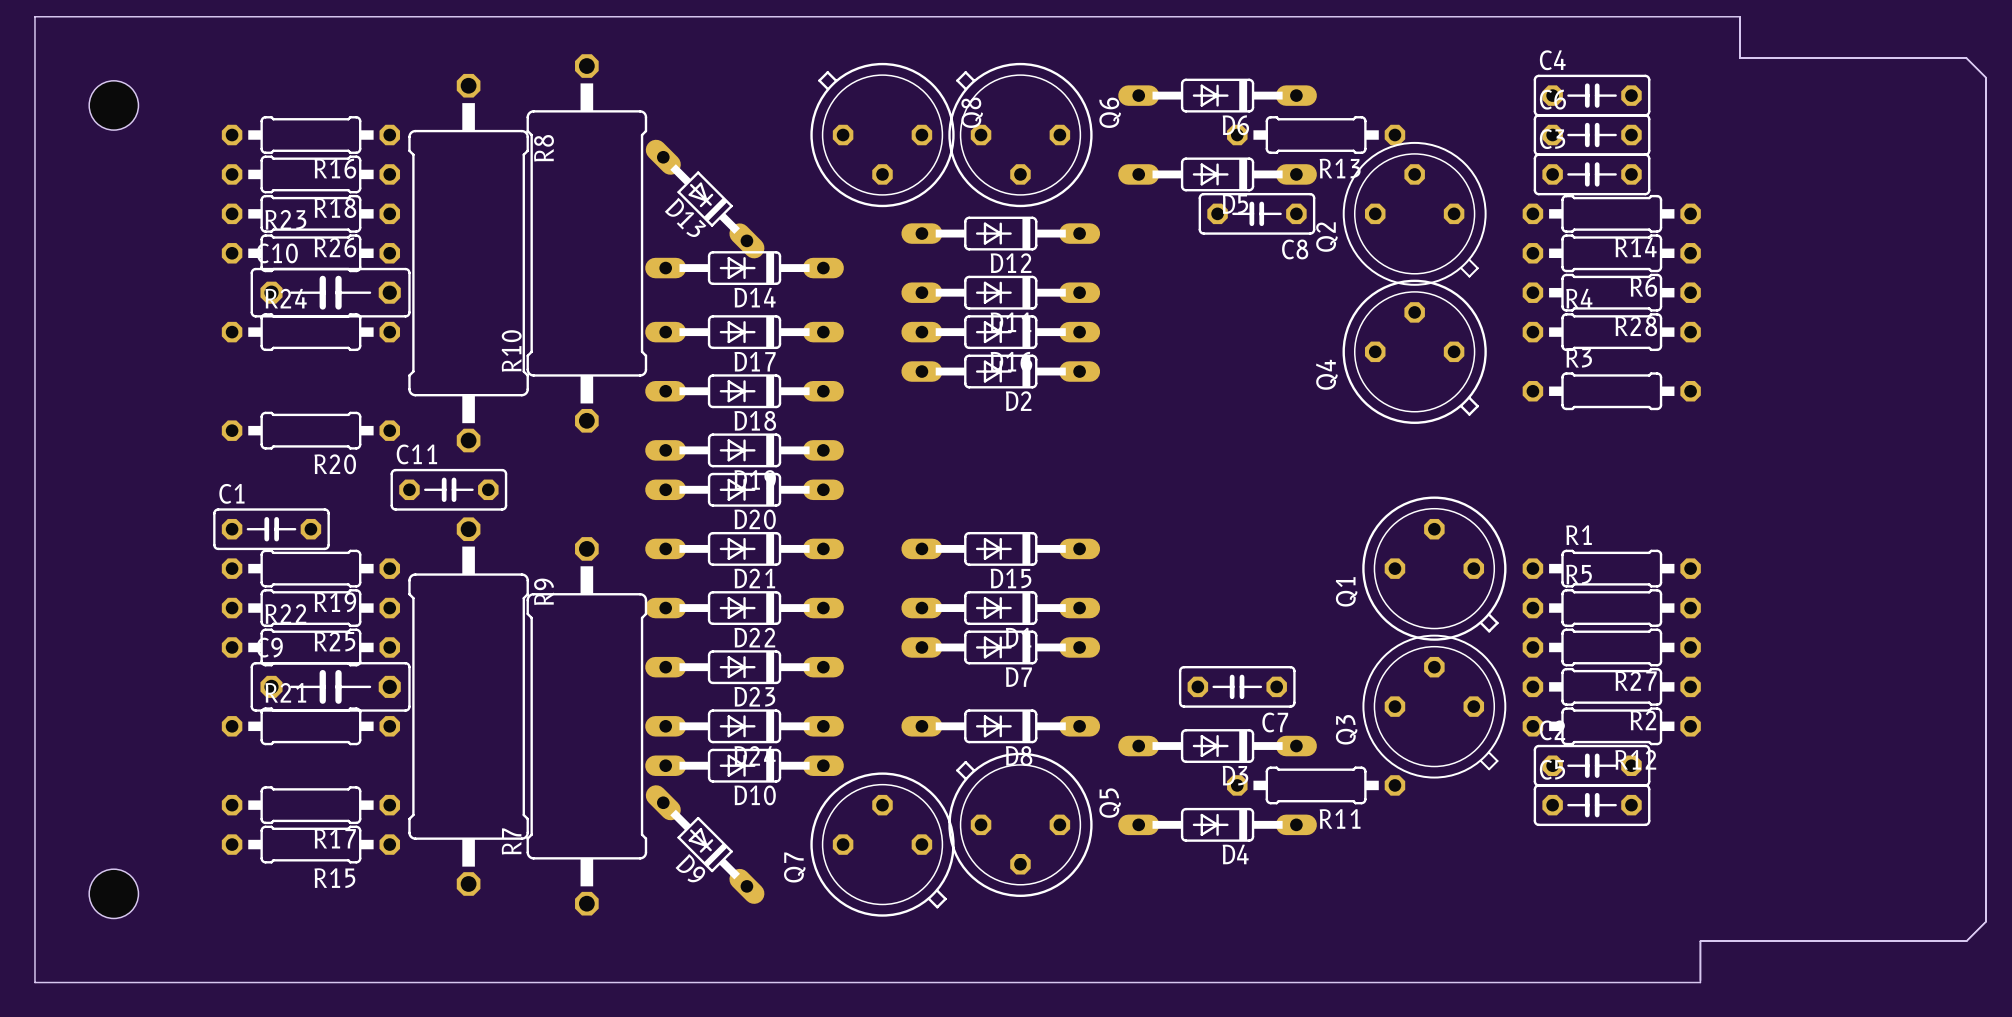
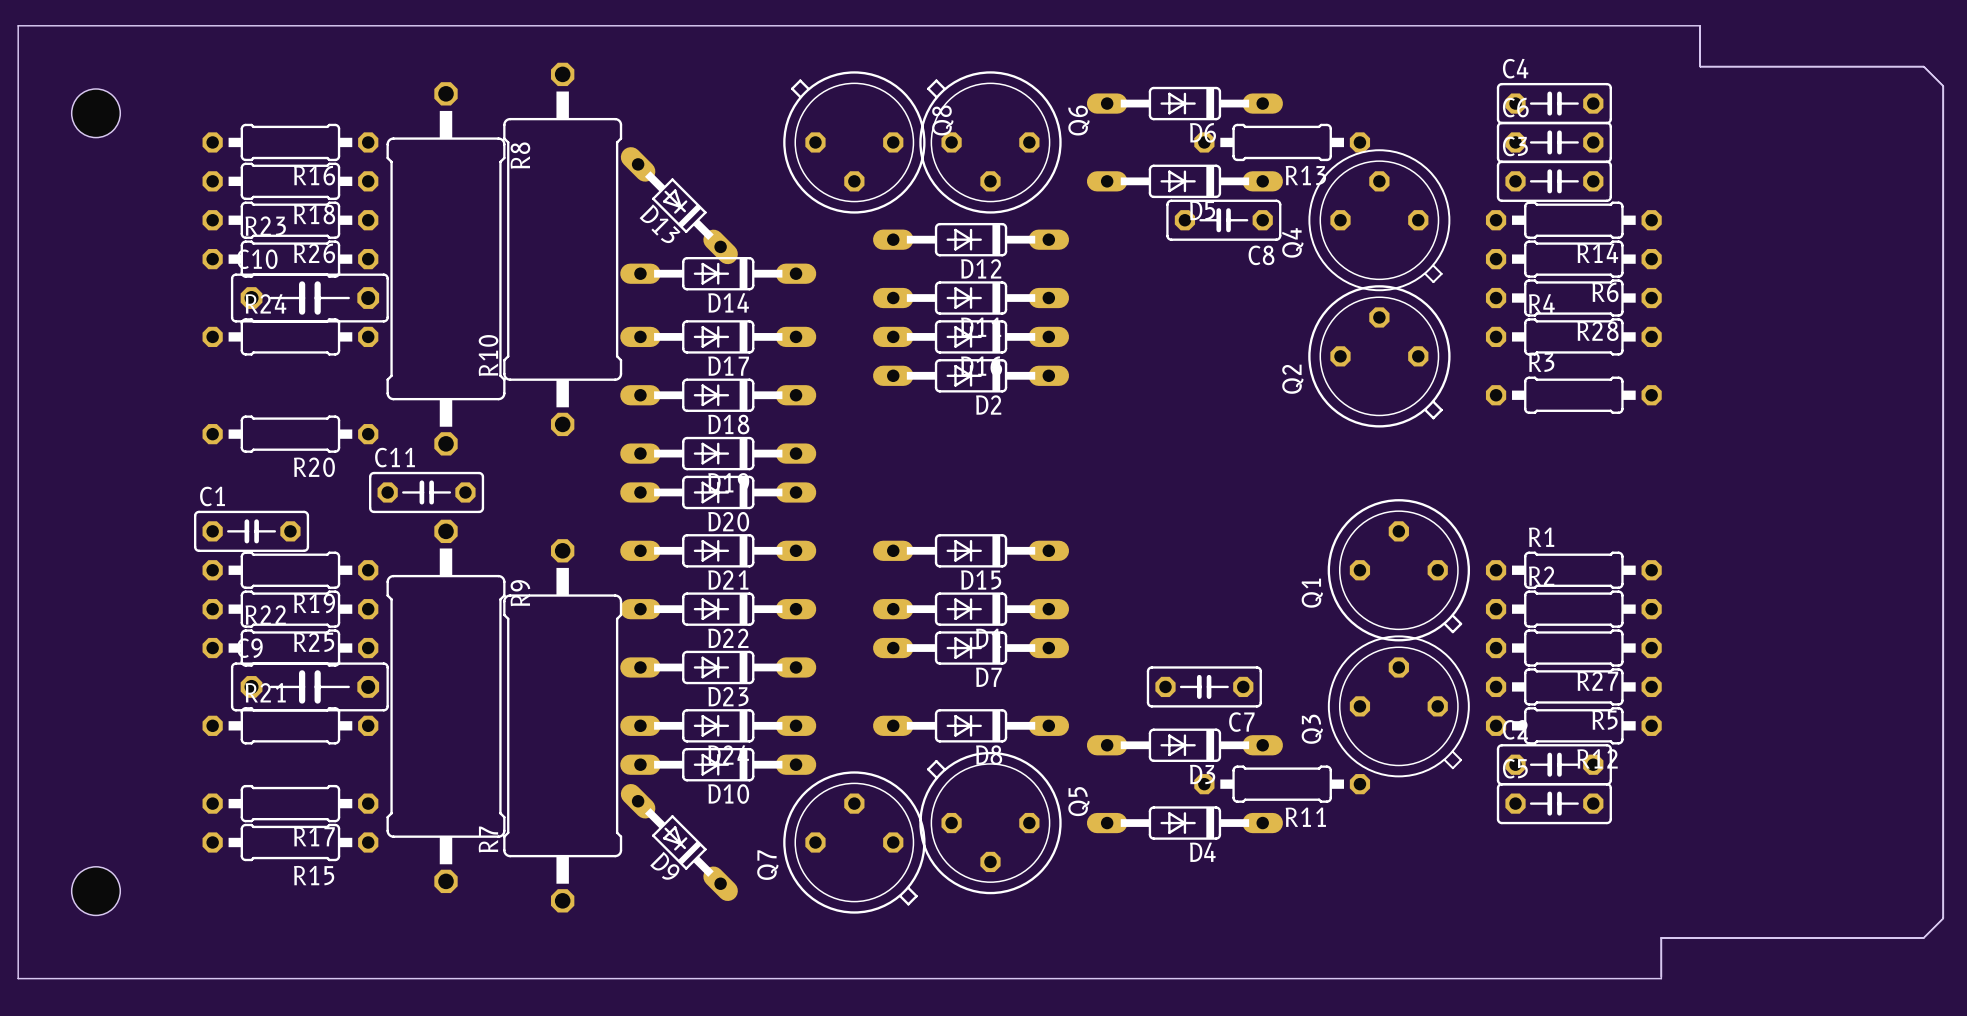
Q2 name: Q2 (1326, 237) -> Q4 (1292, 242)
Q4 name: Q4 (1326, 374) -> Q2 (1292, 379)
R5 name: R5 (1579, 574) -> R2 (1541, 576)
R2 name: R2 (1643, 720) -> R5 (1604, 720)

